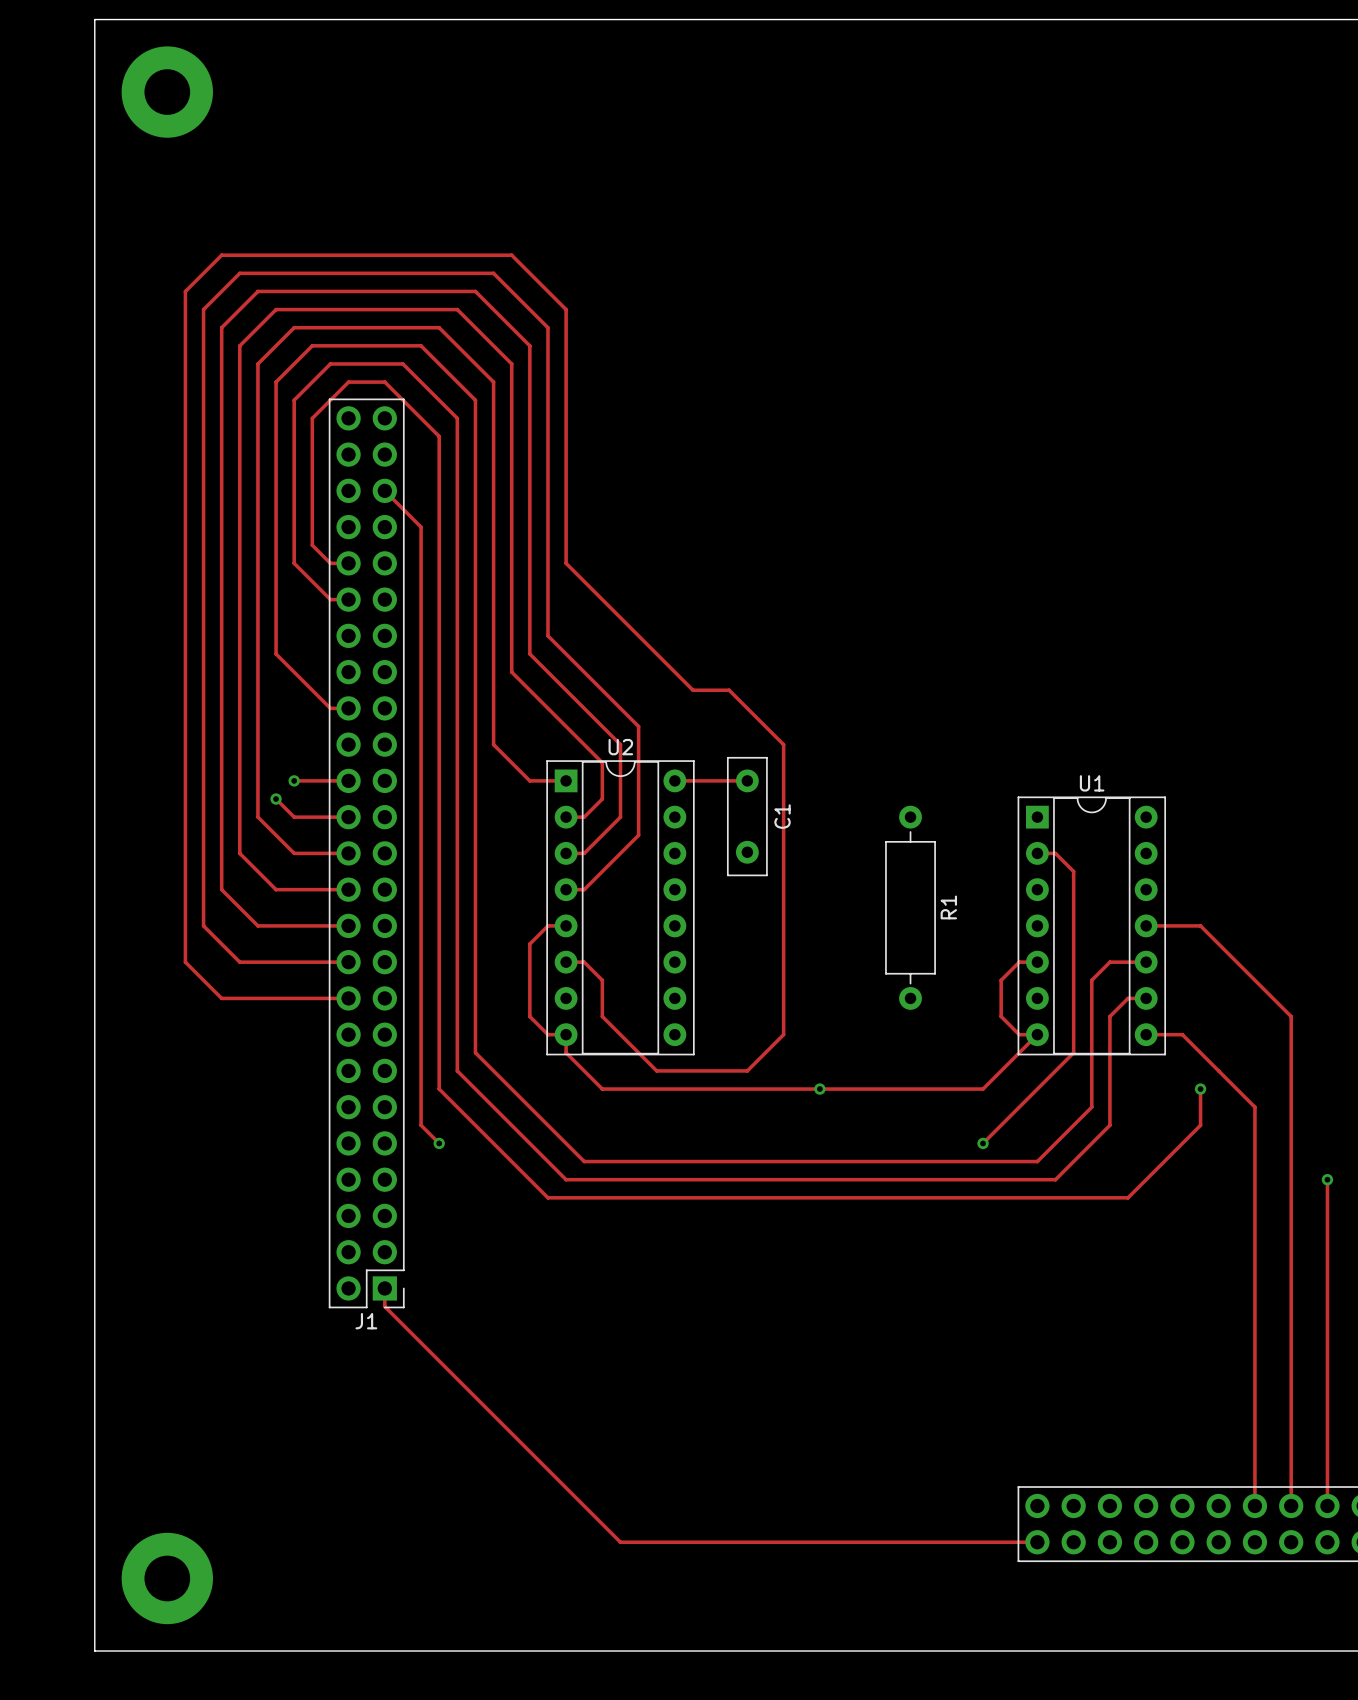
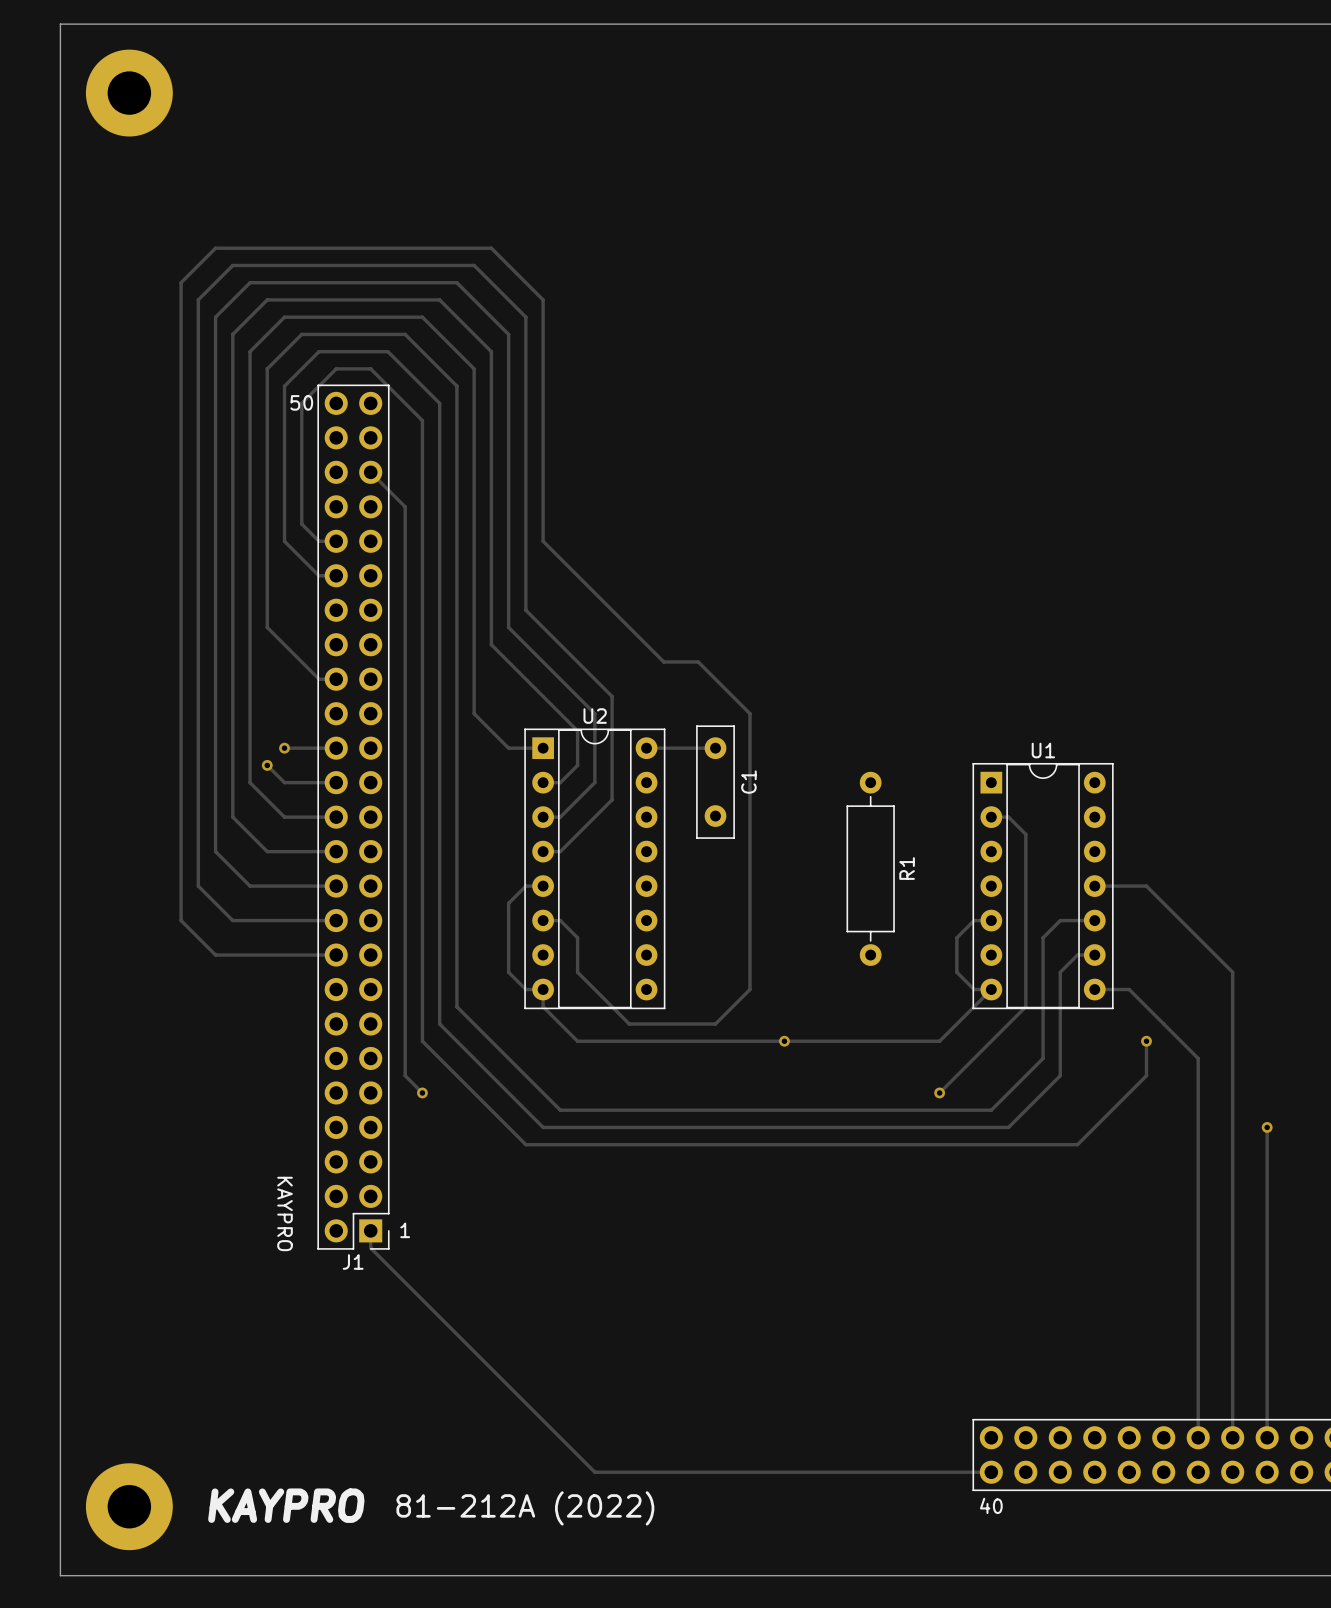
board edge: (94, 19) (94, 1651) -> (94, 24) (60, 24) (60, 1575) (94, 1575)
part position: (167, 92) -> (129, 93)
text: none -> 50 (301, 402)
text: none -> KAYPRO (285, 1213)
text: none -> 1 (405, 1230)
text: none -> KAYPRO (286, 1505)
text: none -> 40 (991, 1505)
part position: (167, 1578) -> (129, 1506)
text: none -> 81-212A (2022) (525, 1508)

